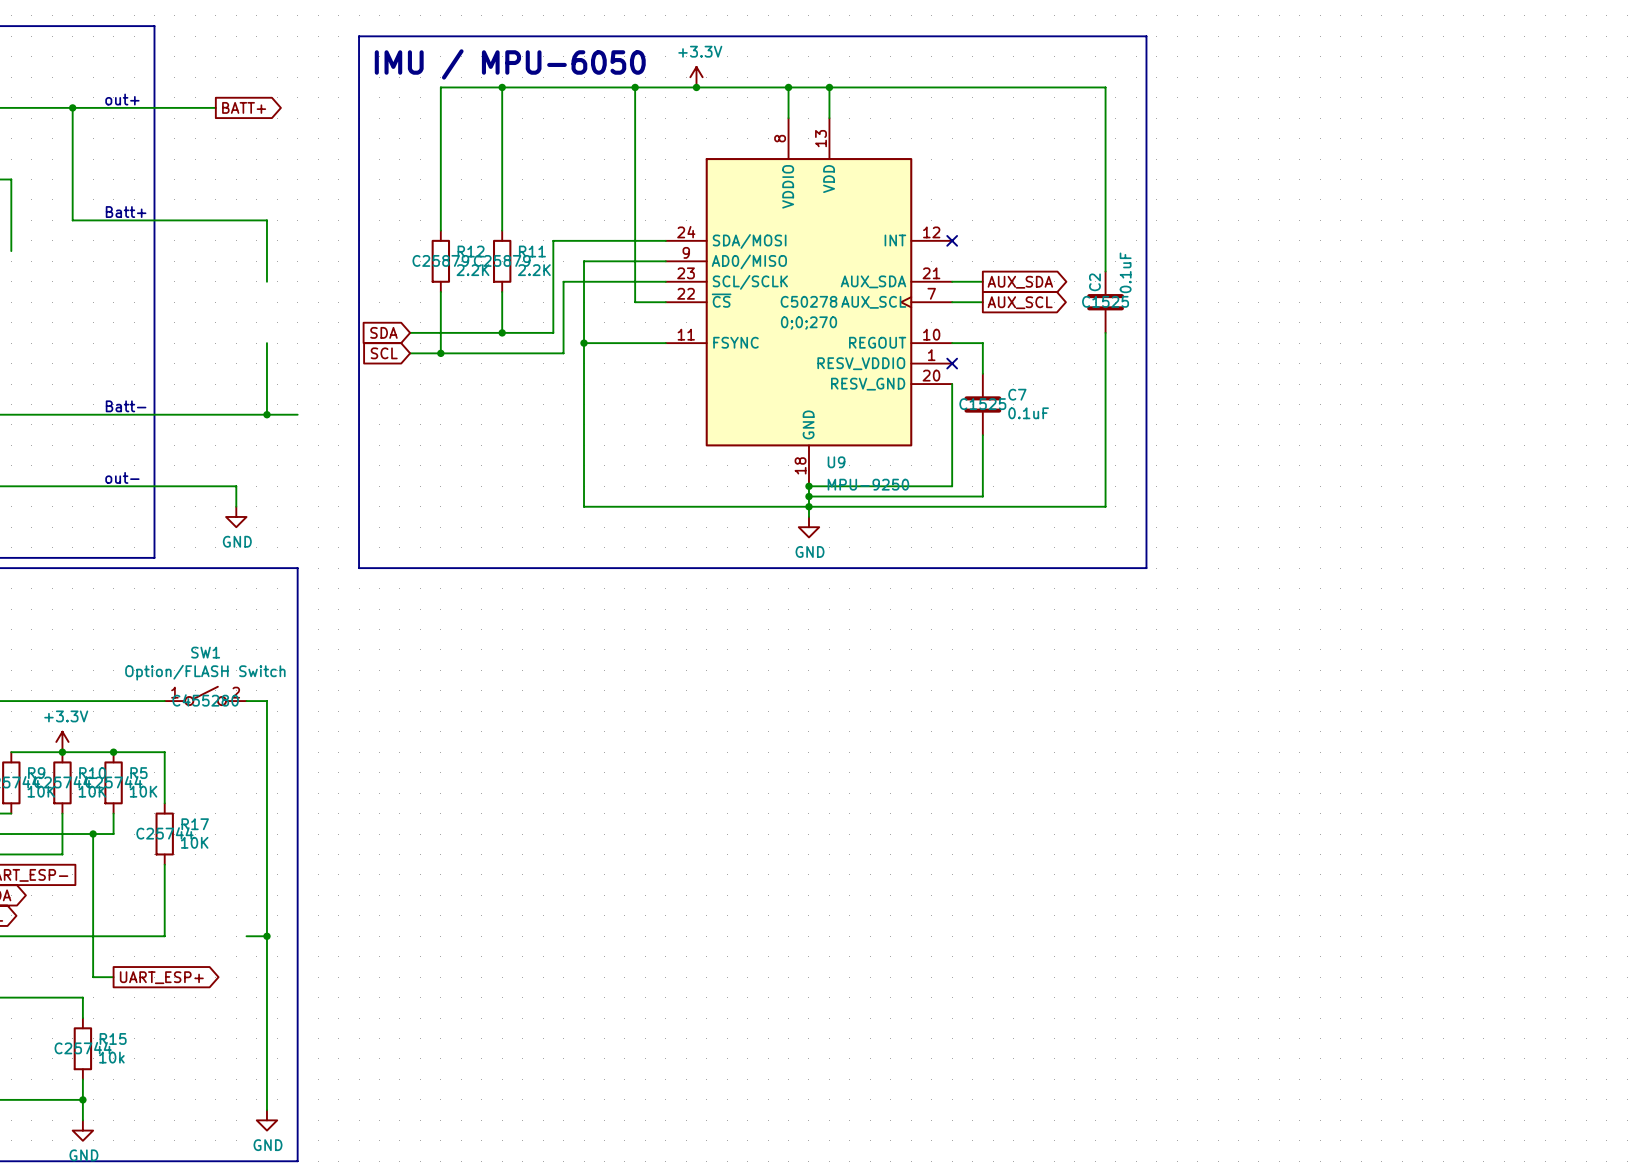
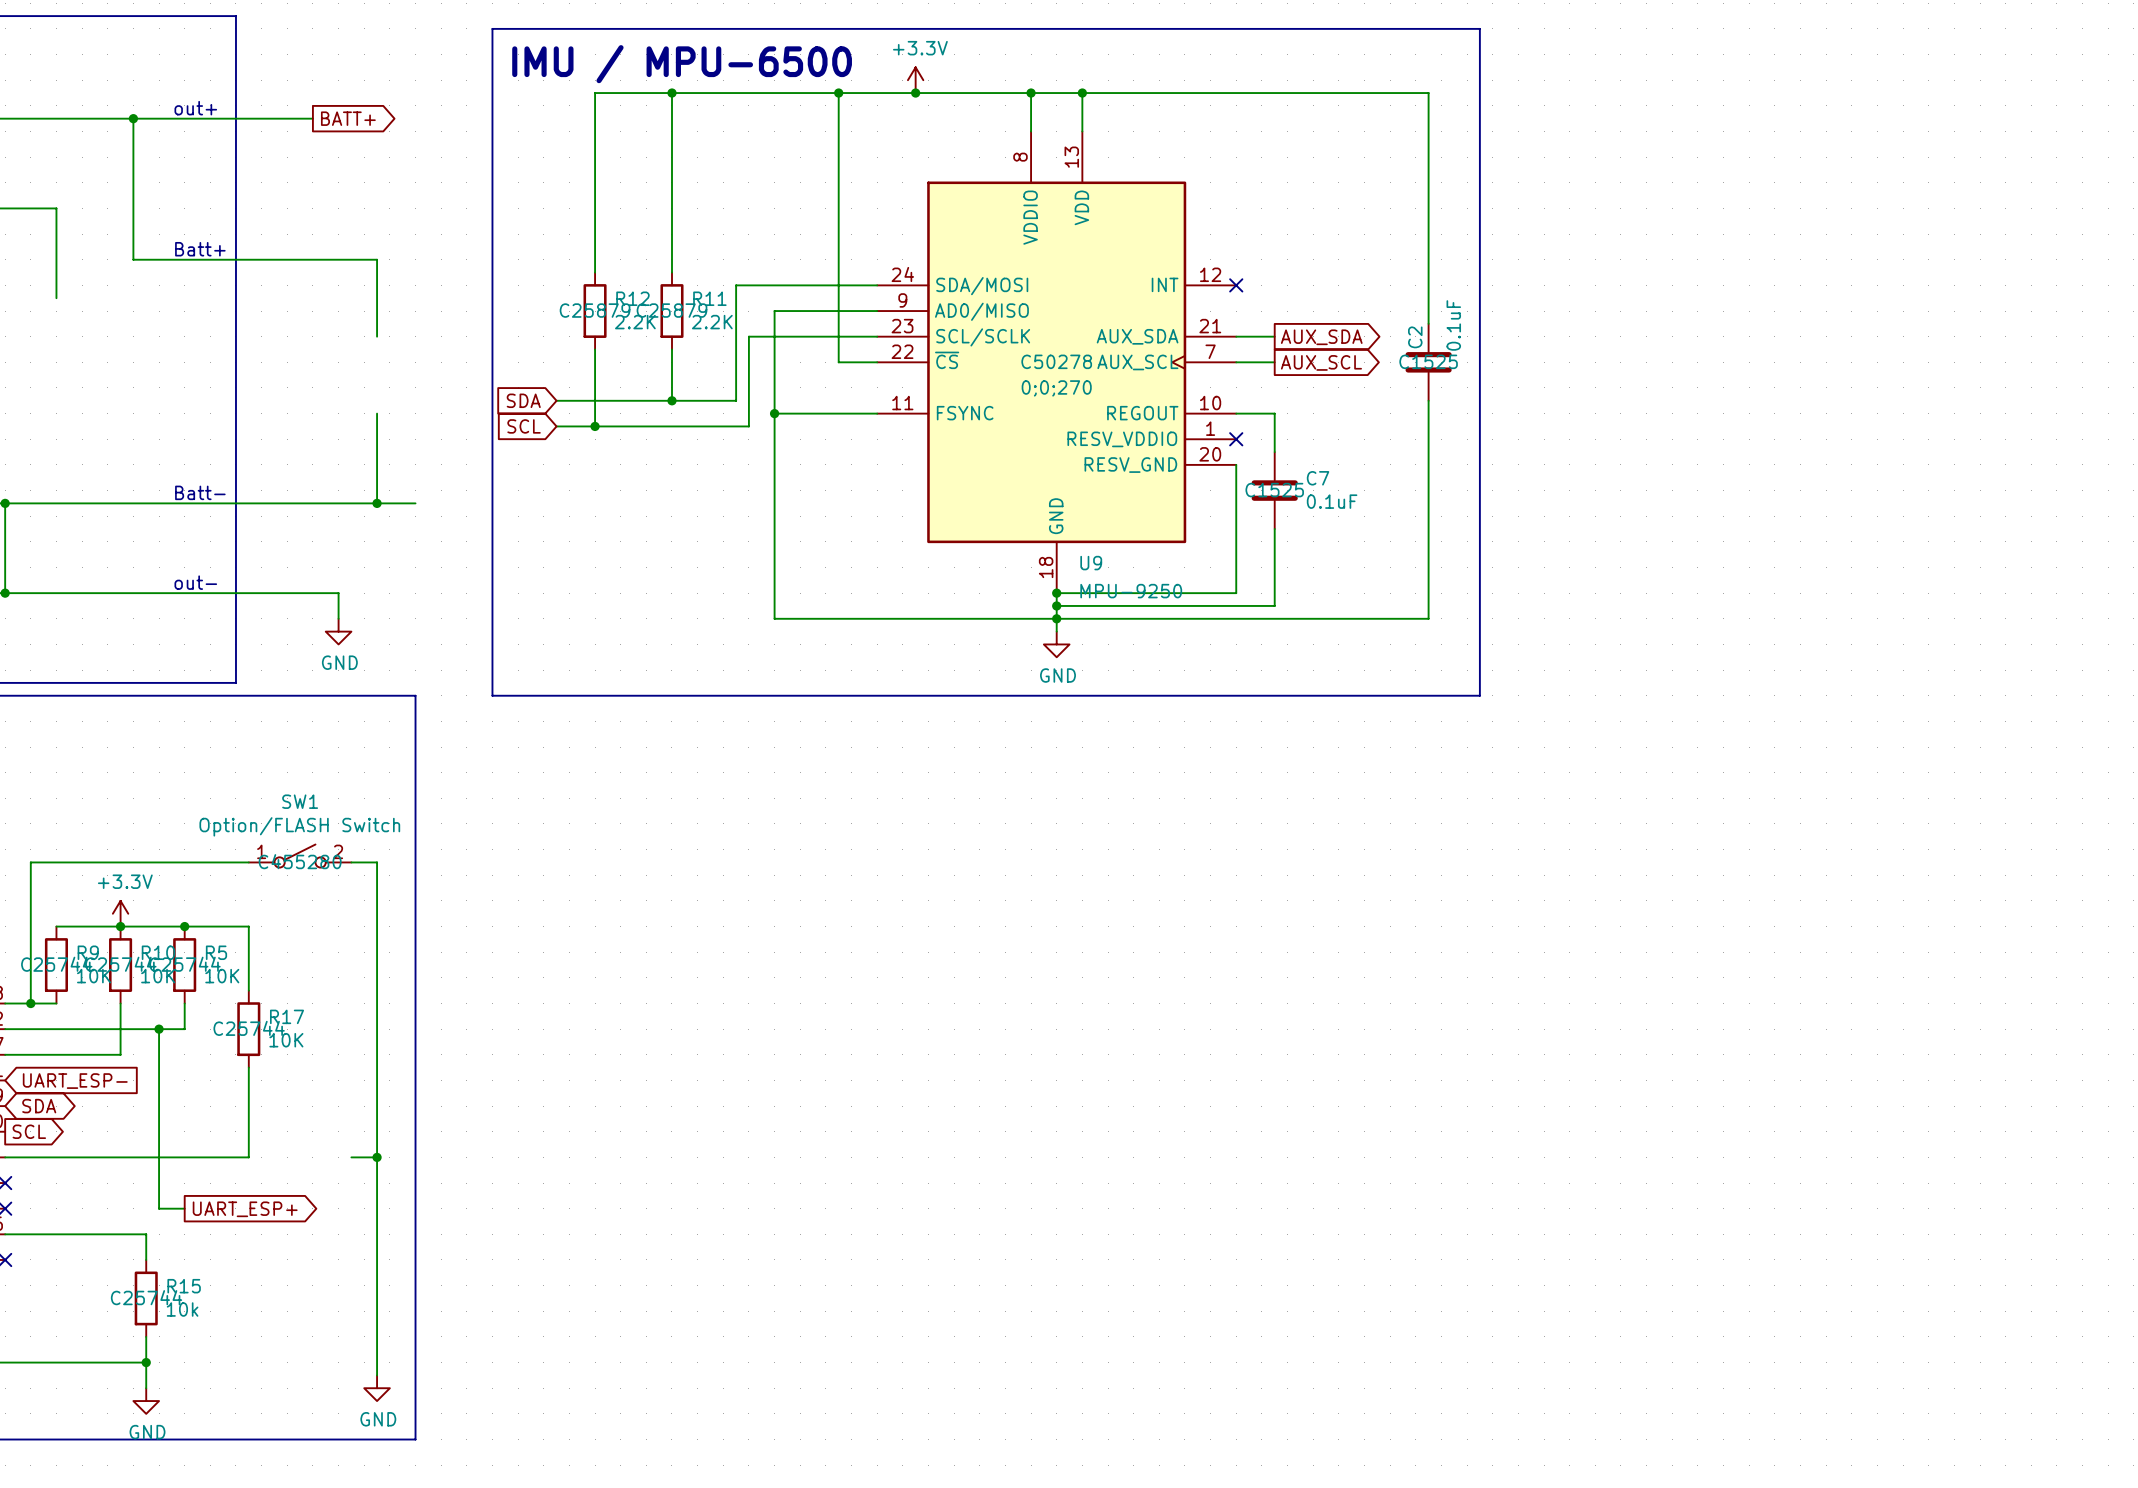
text: IMU / MPU-6050 (510, 64) -> IMU / MPU-6500 (682, 64)

